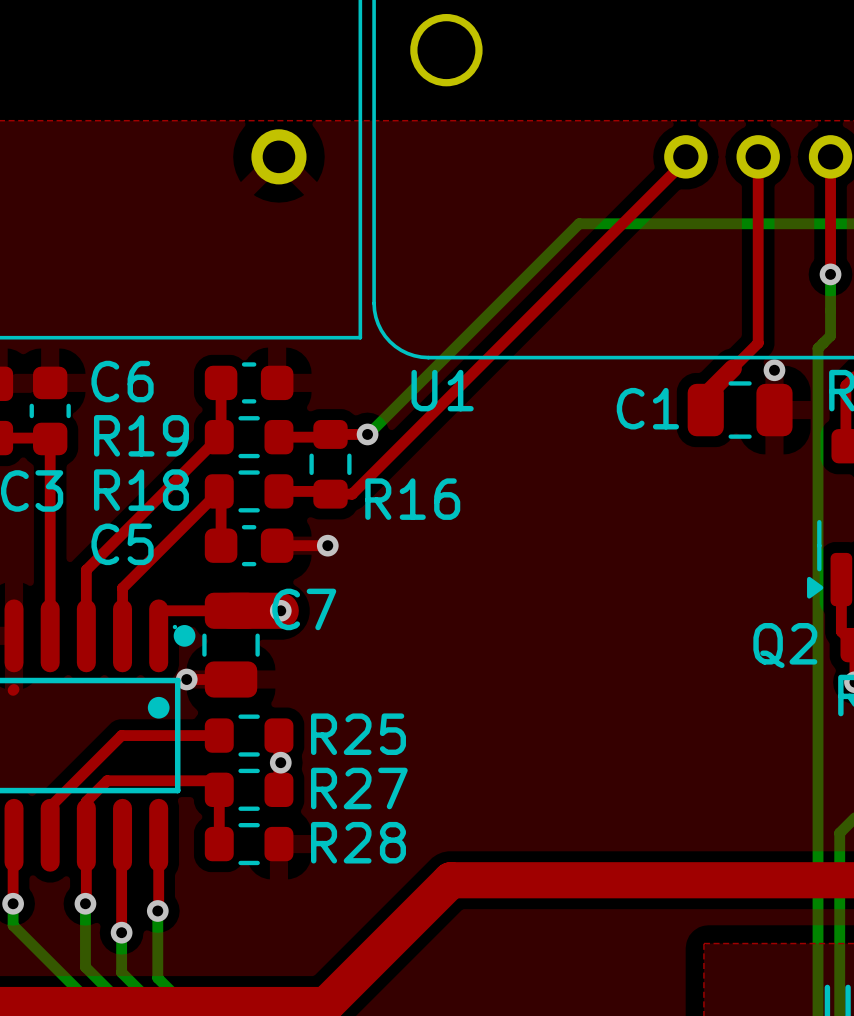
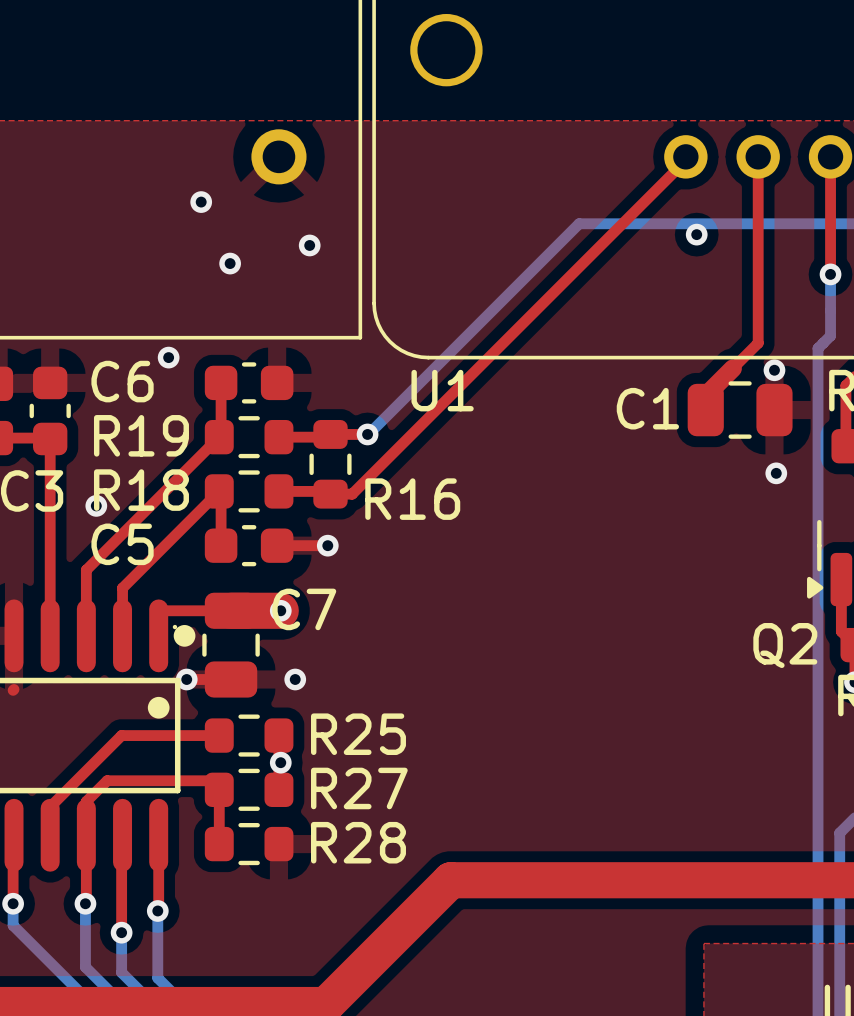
via: none -> (201, 202)
via: none -> (696, 234)
via: none -> (309, 245)
via: none -> (230, 263)
via: none -> (168, 357)
via: none -> (776, 473)
via: none -> (96, 505)
via: none -> (295, 679)

